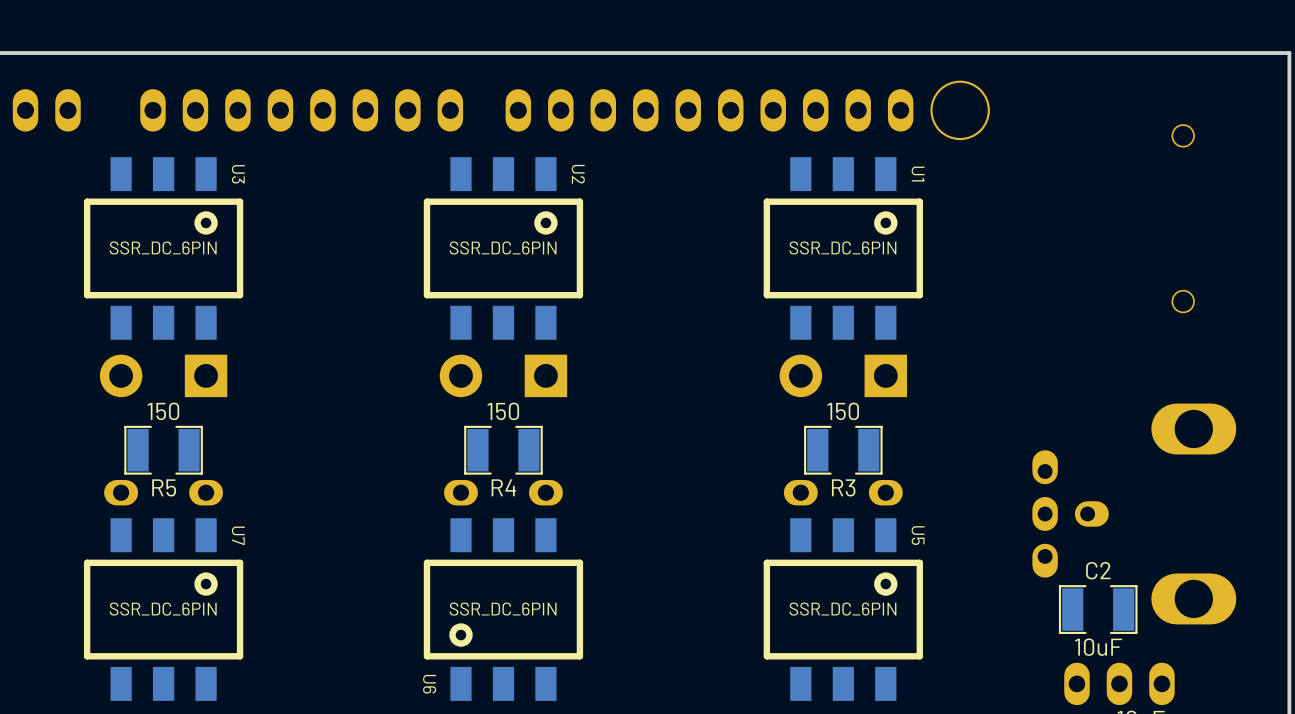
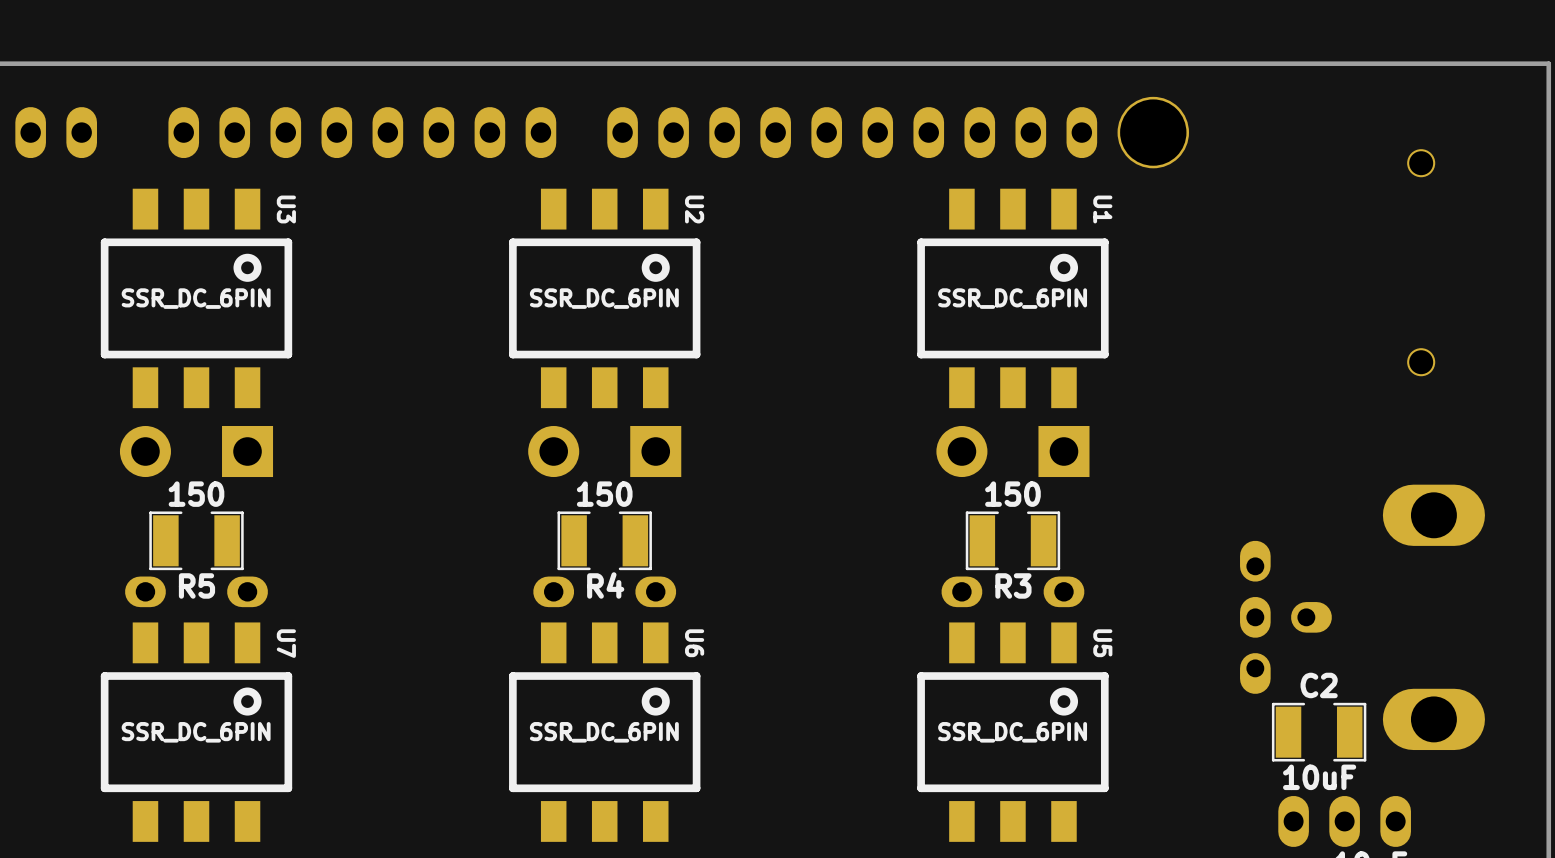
U6 rotation: 0° (503, 609) -> 180° (604, 732)

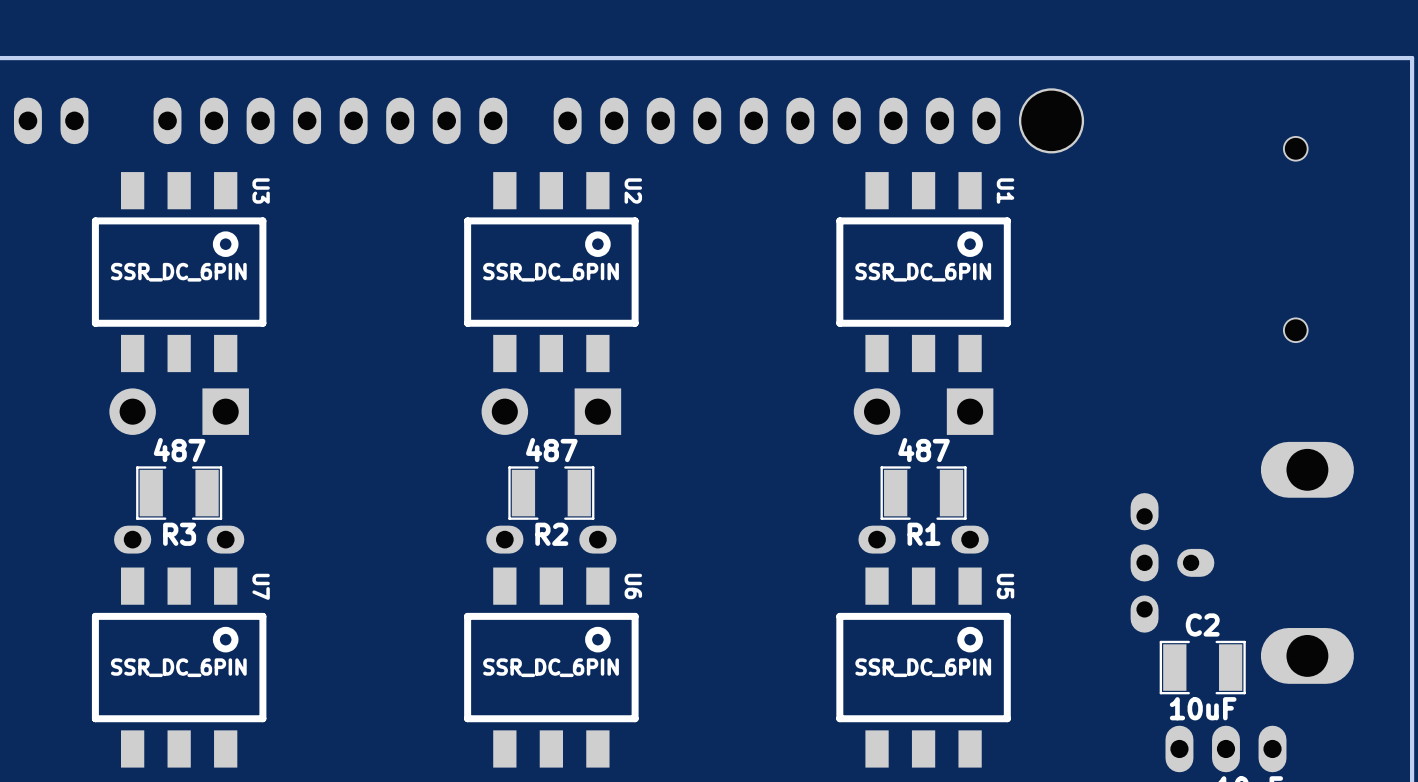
R5 value: 150 (196, 494) -> 487 (179, 450)
R4 value: 150 (604, 494) -> 487 (551, 450)
R3 value: 150 (1012, 494) -> 487 (924, 450)
R5 name: R5 (196, 585) -> R3 (179, 534)
R4 name: R4 (605, 585) -> R2 (551, 534)
R3 name: R3 (1013, 585) -> R1 (924, 534)

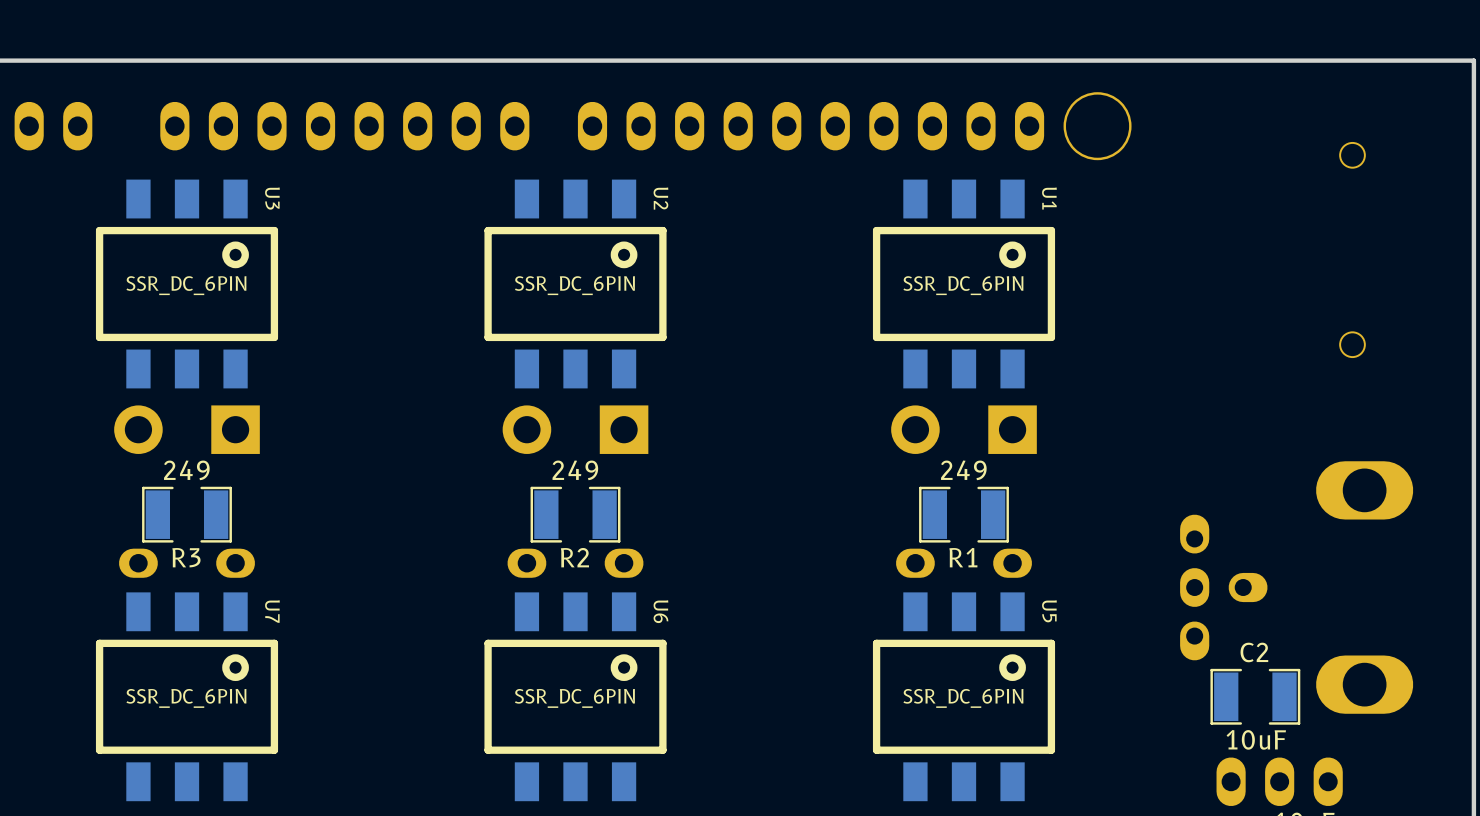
R3 value: 487 (179, 450) -> 249 (186, 470)
R2 value: 487 (551, 450) -> 249 (575, 470)
R1 value: 487 (924, 450) -> 249 (963, 470)

